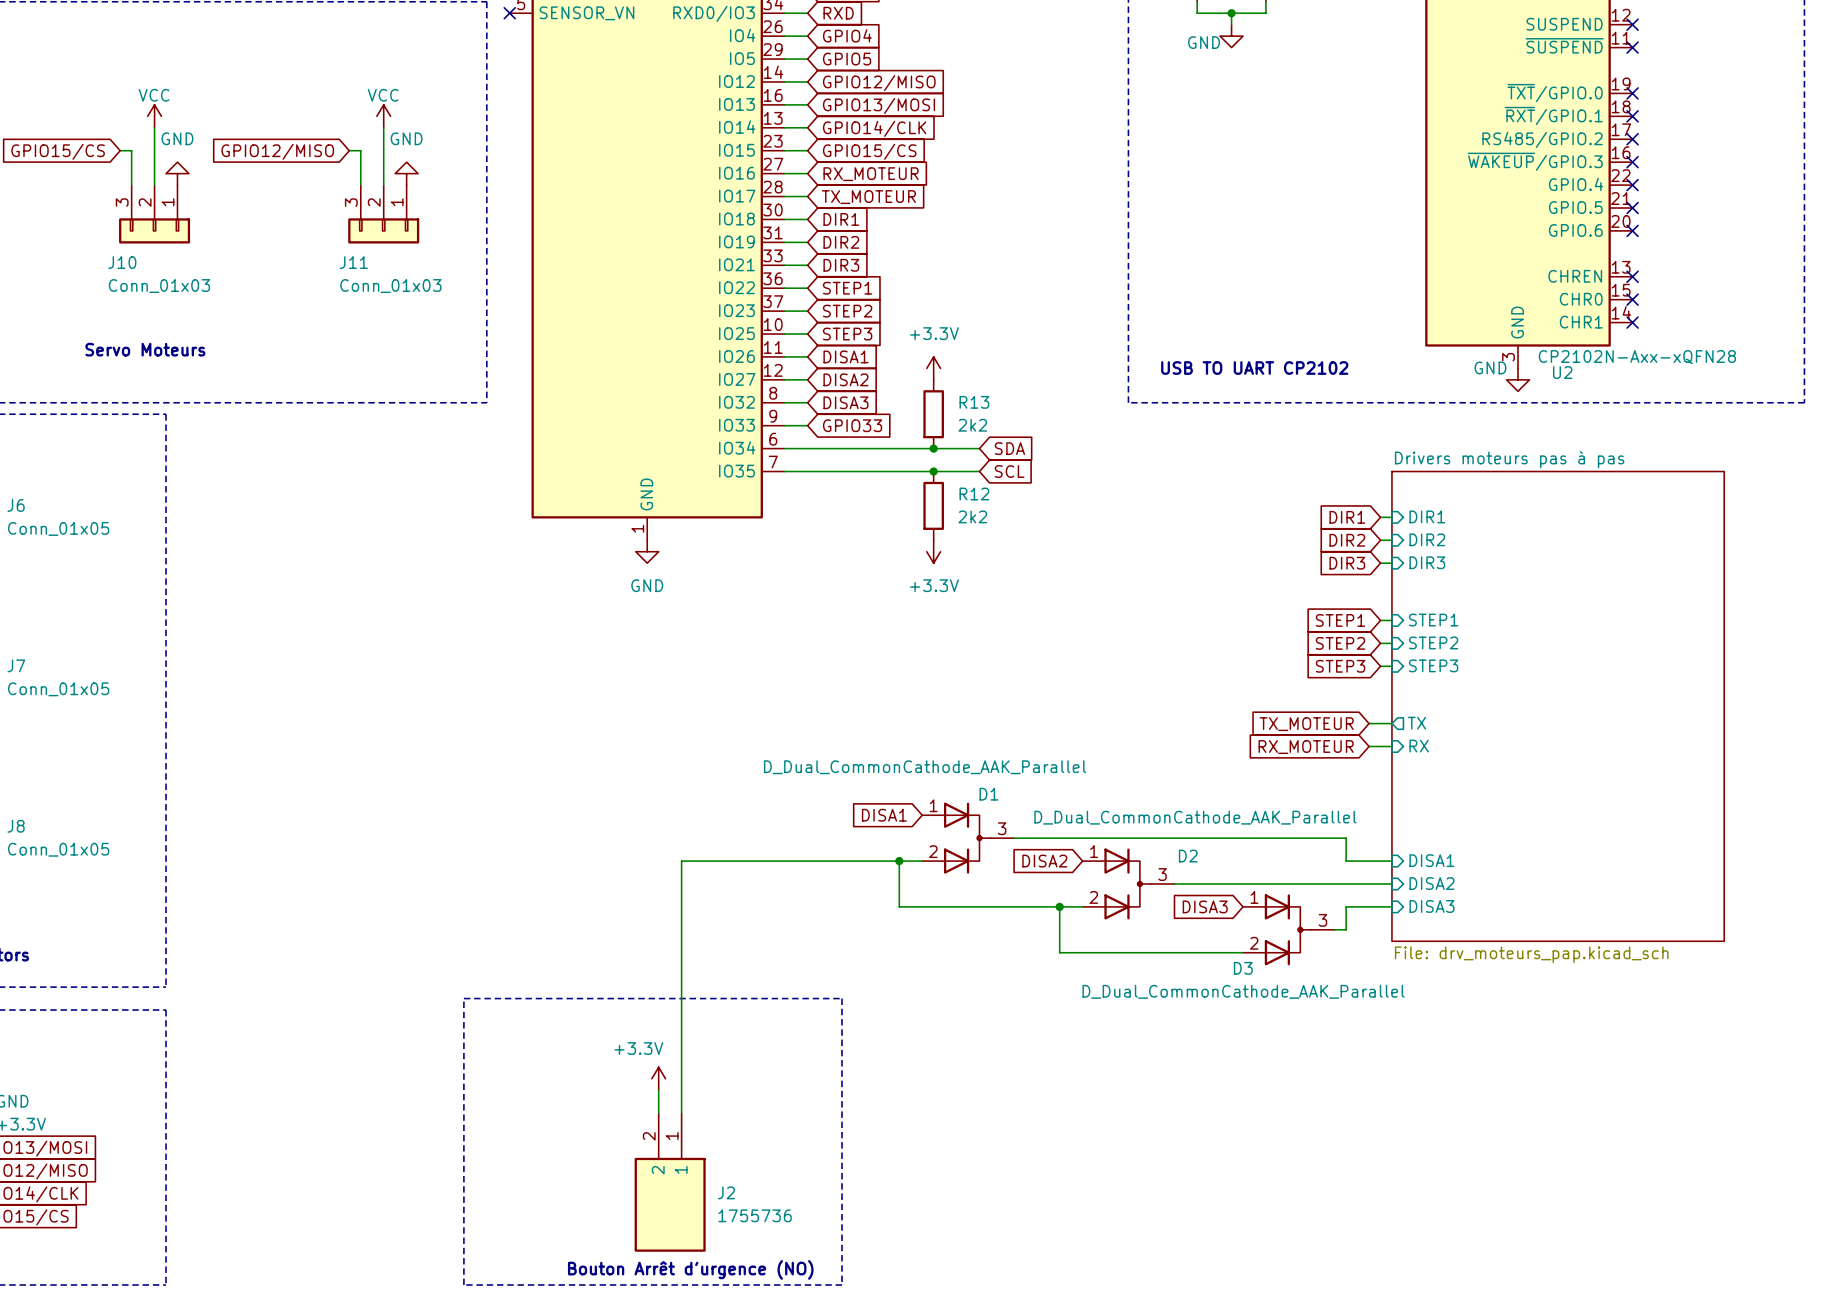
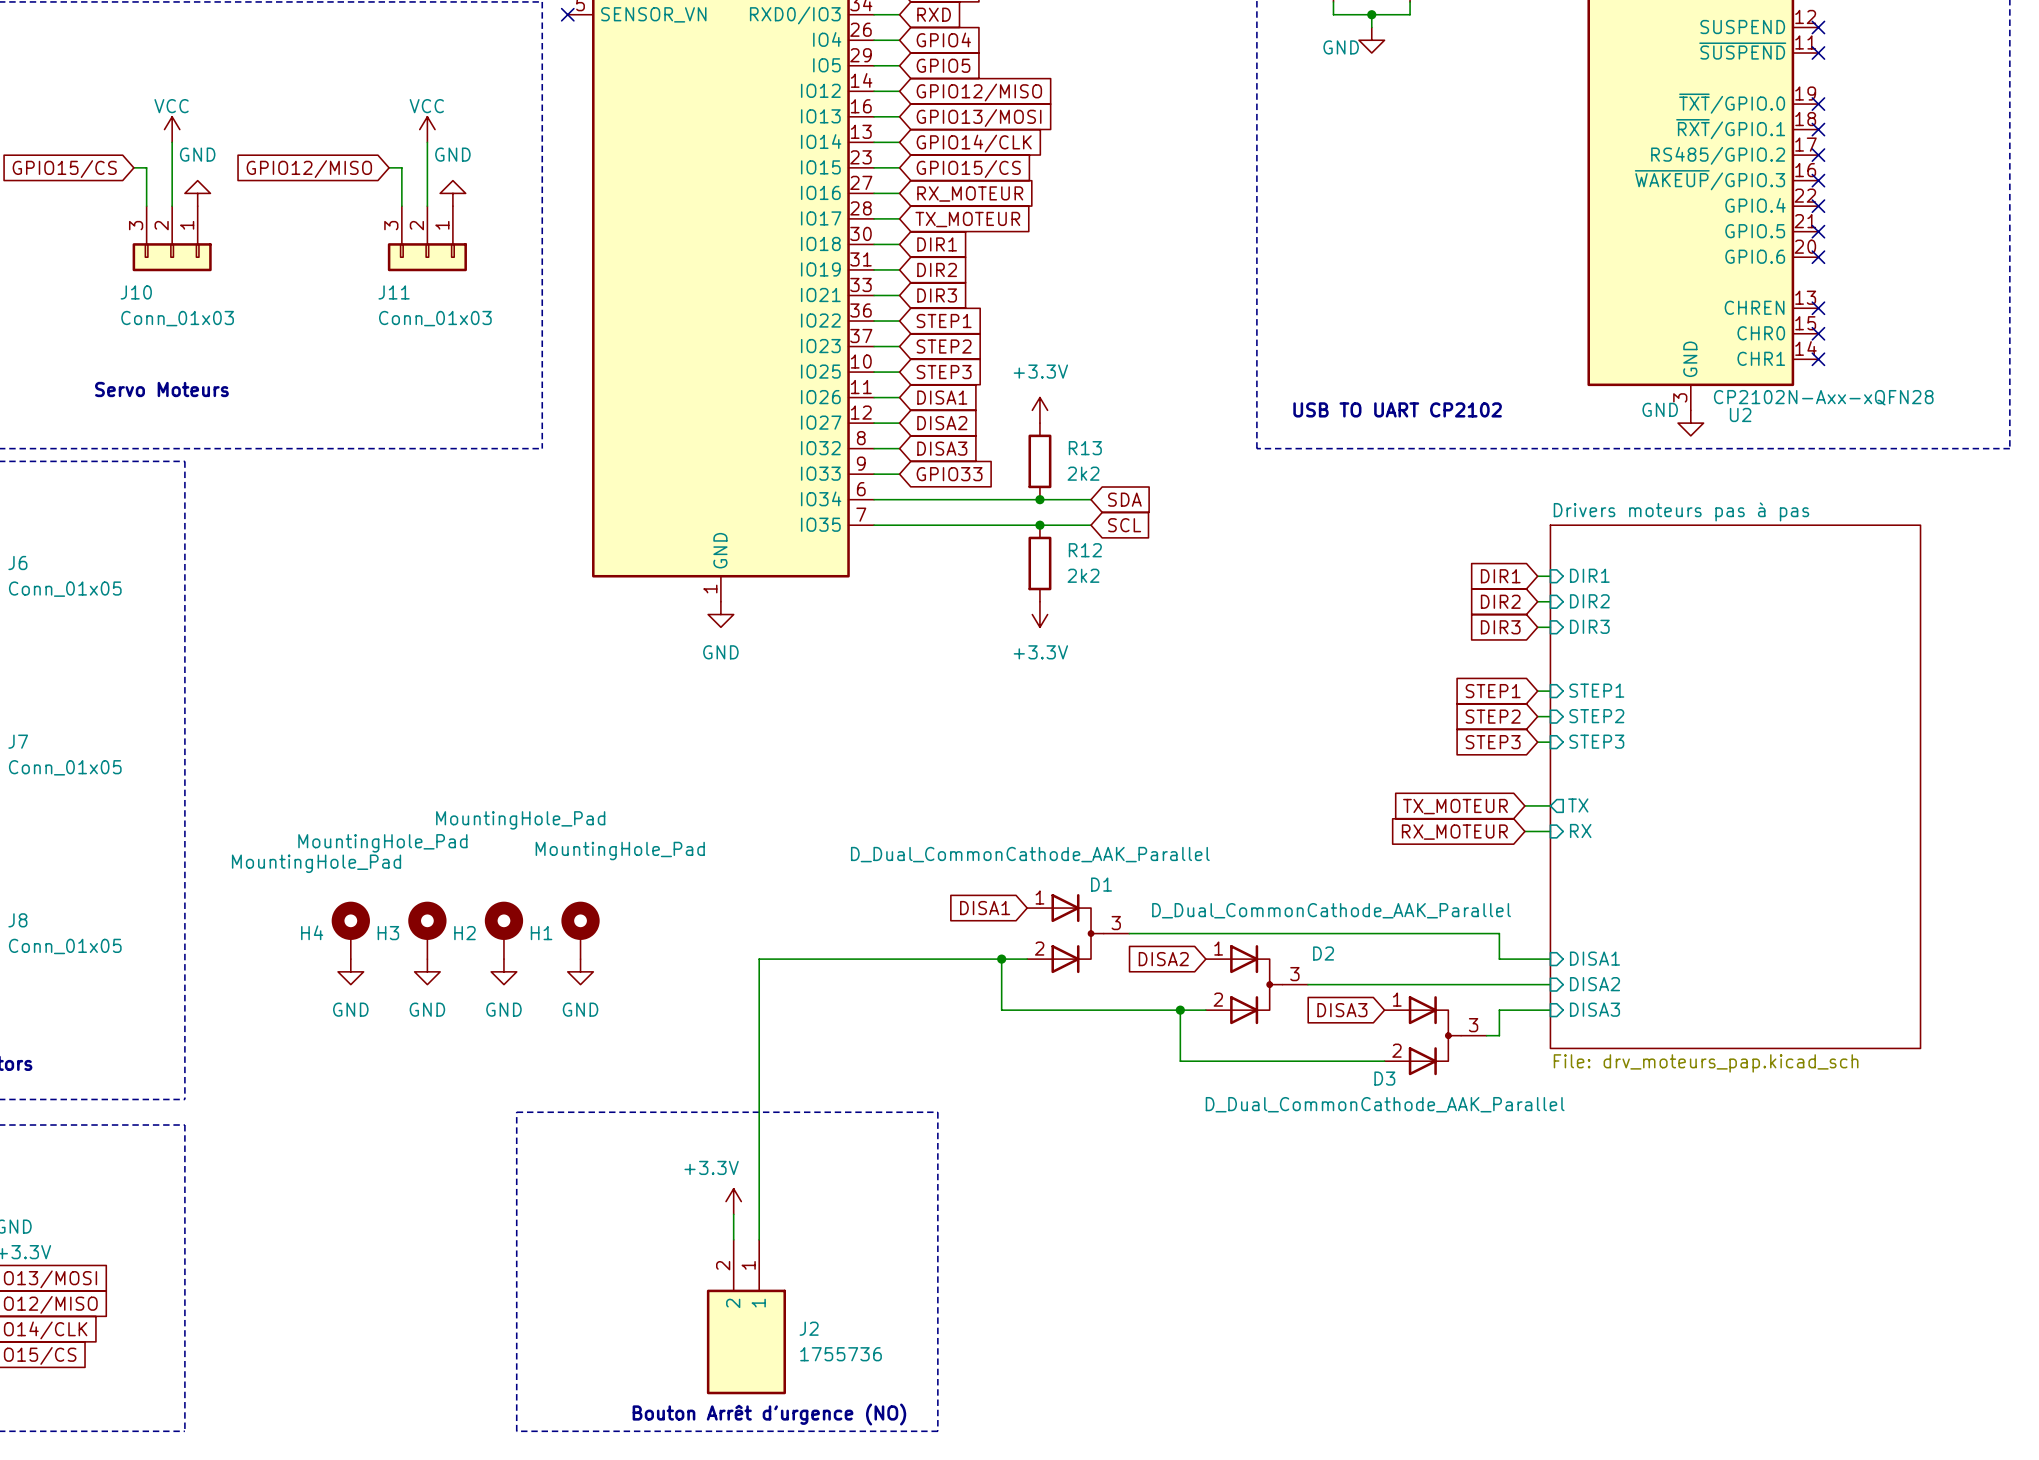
H4: none -> MountingHole_Pad (350, 930)
H3: none -> MountingHole_Pad (427, 930)
H2: none -> MountingHole_Pad (503, 930)
H1: none -> MountingHole_Pad (580, 930)
power symbol: none -> GND (350, 971)
power symbol: none -> GND (427, 971)
power symbol: none -> GND (503, 971)
power symbol: none -> GND (580, 971)

